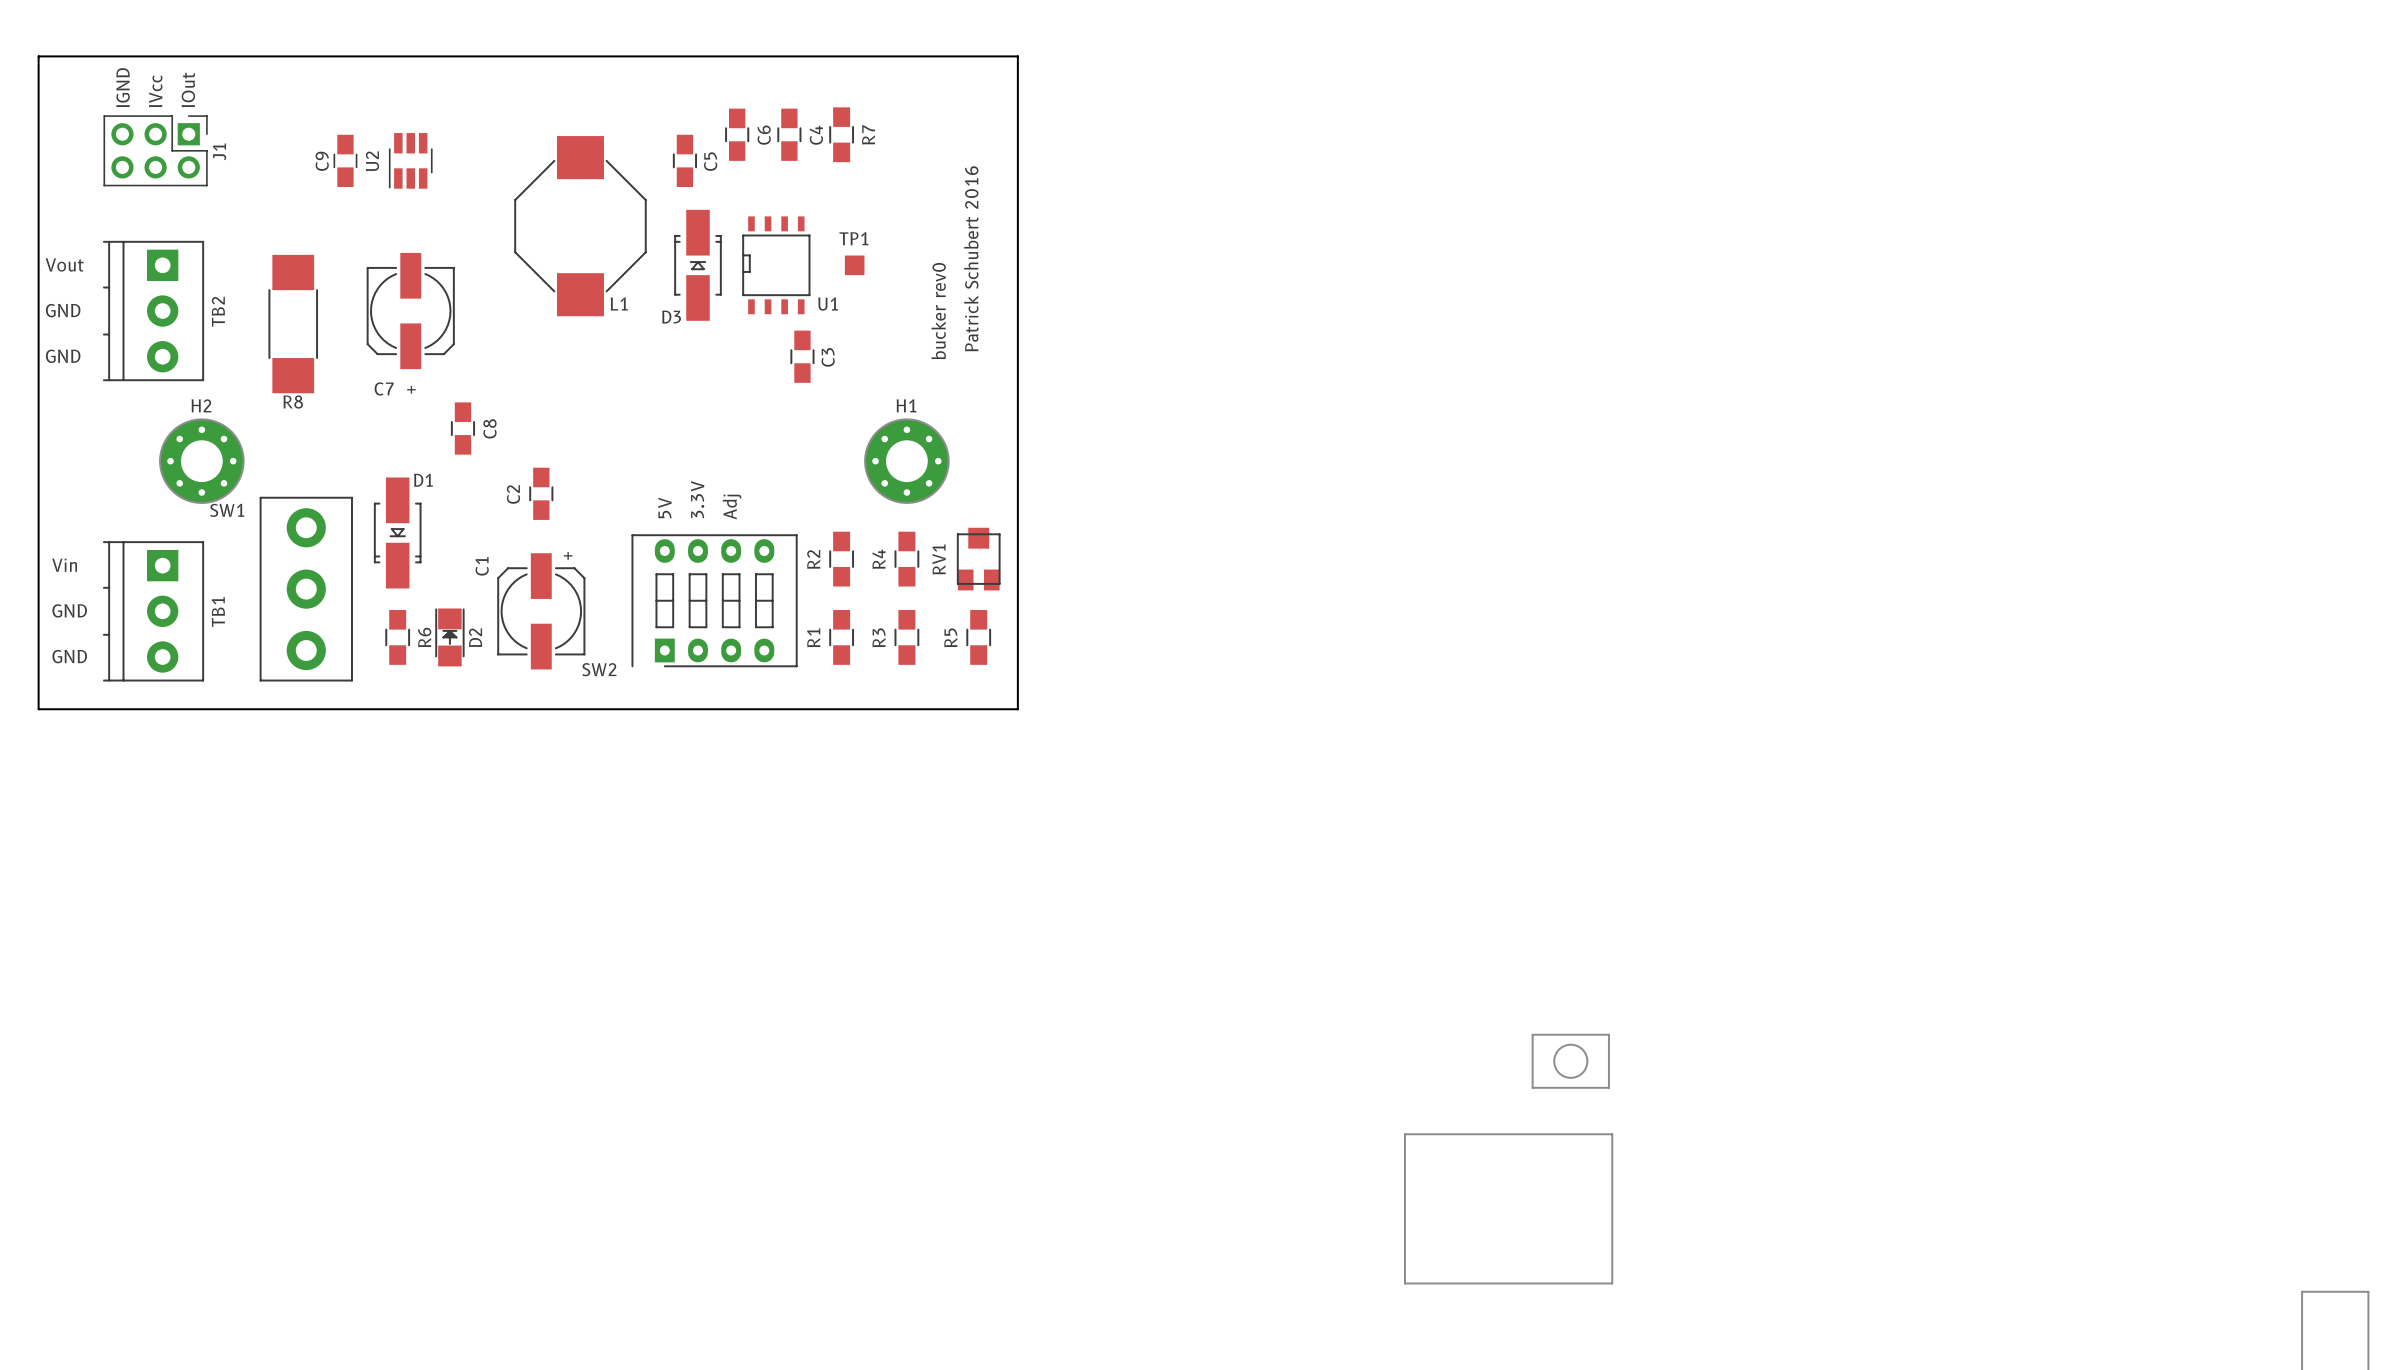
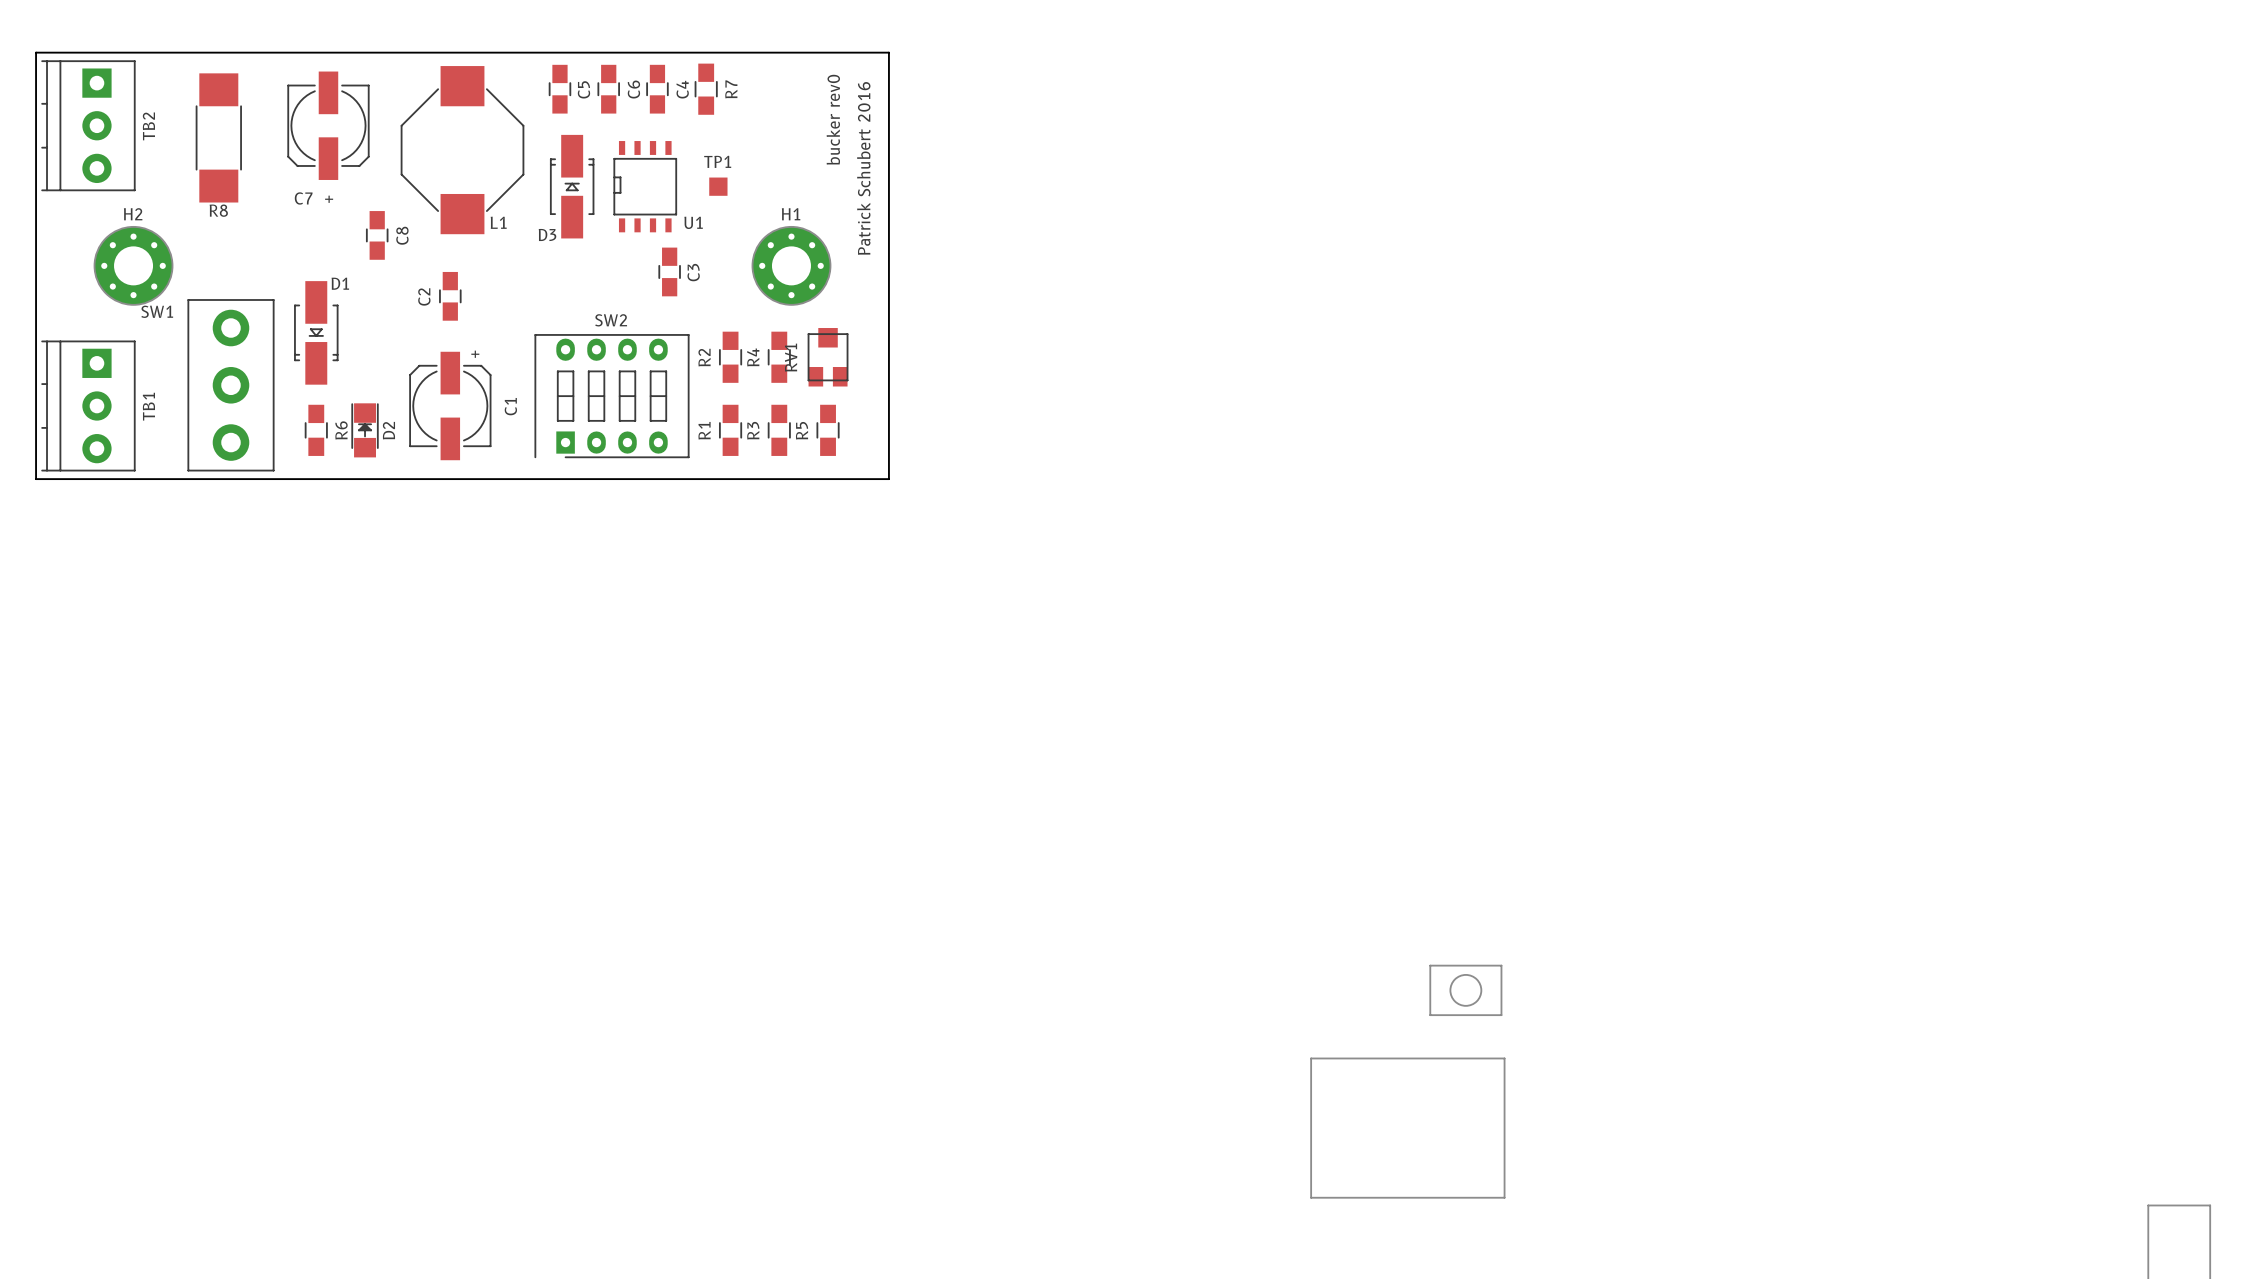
board edge: (952, 56) (1017, 56) (1017, 709) (38, 709) (38, 513) -> (888, 52) (888, 479) (36, 479)
text: IGND (123, 87) -> none
text: IOut (188, 89) -> none
text: IVcc (155, 91) -> none
C6 position: (737, 134) -> (608, 89)
C4 position: (789, 134) -> (657, 89)
R7 position: (841, 134) -> (706, 89)
J1: (155, 150) -> none
C9: (345, 160) -> none
U2: (410, 160) -> none
C5 position: (684, 160) -> (559, 89)
L1 position: (580, 226) -> (462, 150)
text position: Patrick Schubert 2016 (971, 258) -> Patrick Schubert 2016 (863, 168)
text: Vout (64, 264) -> none
D3 position: (697, 265) -> (572, 186)
U1 position: (776, 265) -> (645, 186)
TP1 position: (854, 265) -> (718, 186)
text: GND (63, 310) -> none
TB2 position: (153, 311) -> (88, 125)
C7 position: (410, 311) -> (328, 125)
text position: bucker rev0 (938, 311) -> bucker rev0 (833, 119)
R8 position: (293, 324) -> (218, 137)
text: GND (63, 356) -> none
C3 position: (802, 356) -> (669, 271)
C8 position: (462, 428) -> (377, 235)
H2 position: (201, 461) -> (133, 265)
H1 position: (906, 461) -> (791, 265)
C2 position: (541, 493) -> (450, 296)
text: 3.3V (697, 499) -> none
text: 5V (664, 507) -> none
text: Adj (731, 507) -> none
D1 position: (397, 532) -> (316, 332)
R2 position: (841, 559) -> (730, 357)
R4 position: (906, 559) -> (779, 357)
RV1 position: (978, 559) -> (828, 357)
text: Vin (64, 565) -> none
C1 name position: C1 (482, 566) -> C1 (510, 406)
SW1 position: (306, 589) -> (230, 385)
SW2 position: (714, 600) -> (612, 396)
text: GND (69, 610) -> none
TB1 position: (153, 611) -> (88, 405)
C1 position: (541, 611) -> (450, 405)
R6 position: (397, 637) -> (316, 430)
D2 position: (449, 637) -> (365, 430)
R1 position: (841, 637) -> (730, 430)
R3 position: (906, 637) -> (779, 430)
R5 position: (978, 637) -> (828, 430)
text: GND (69, 656) -> none
SW2 name position: SW2 (599, 669) -> SW2 (611, 320)

